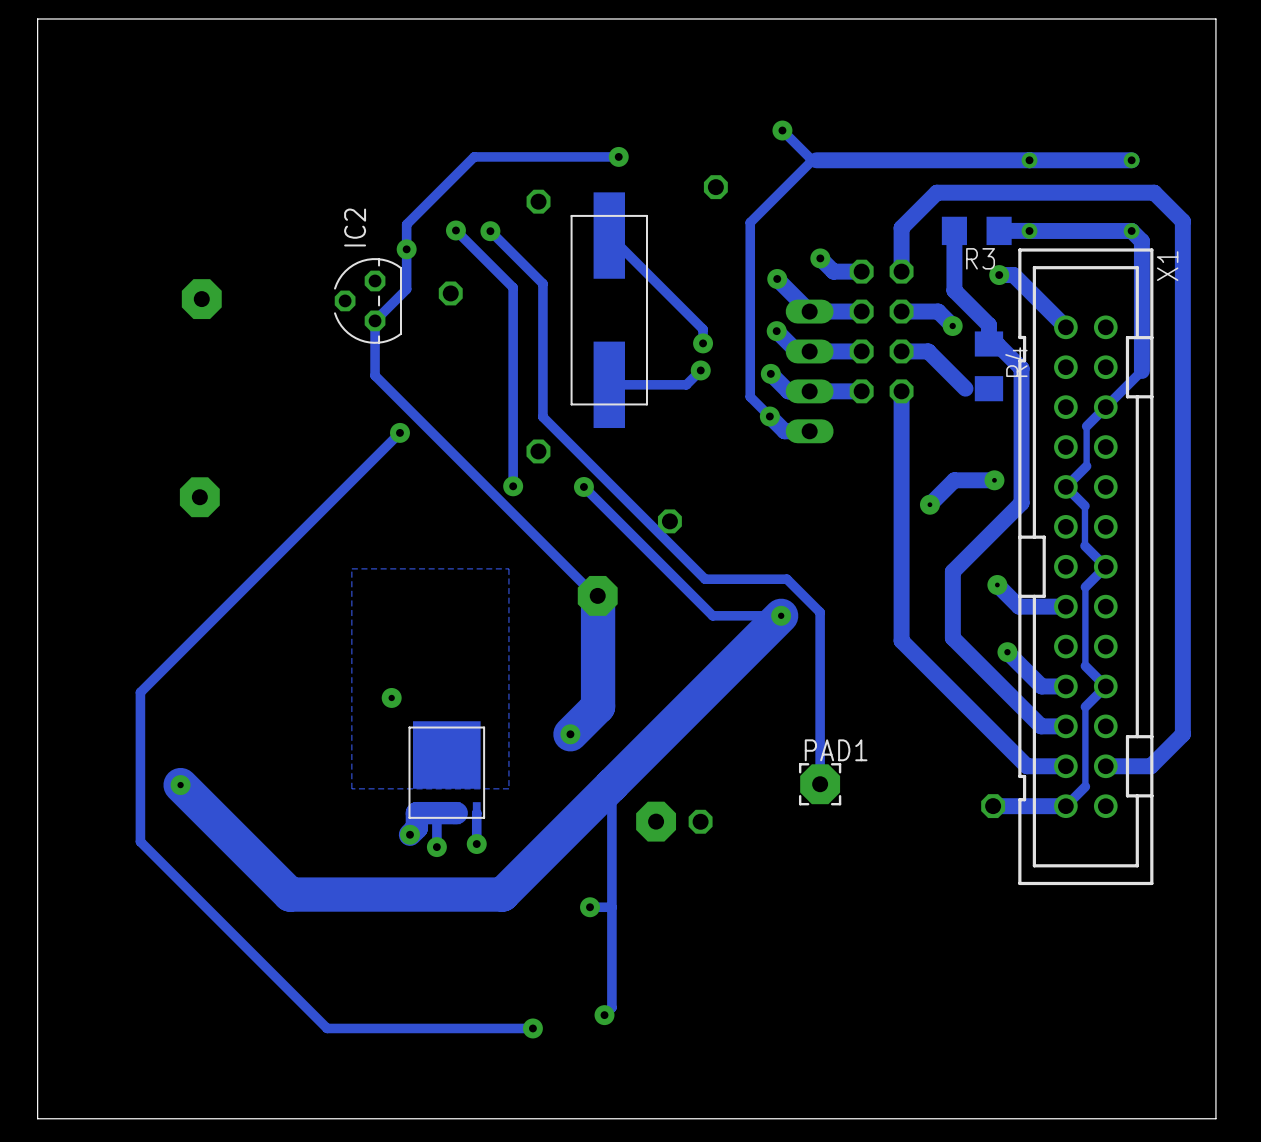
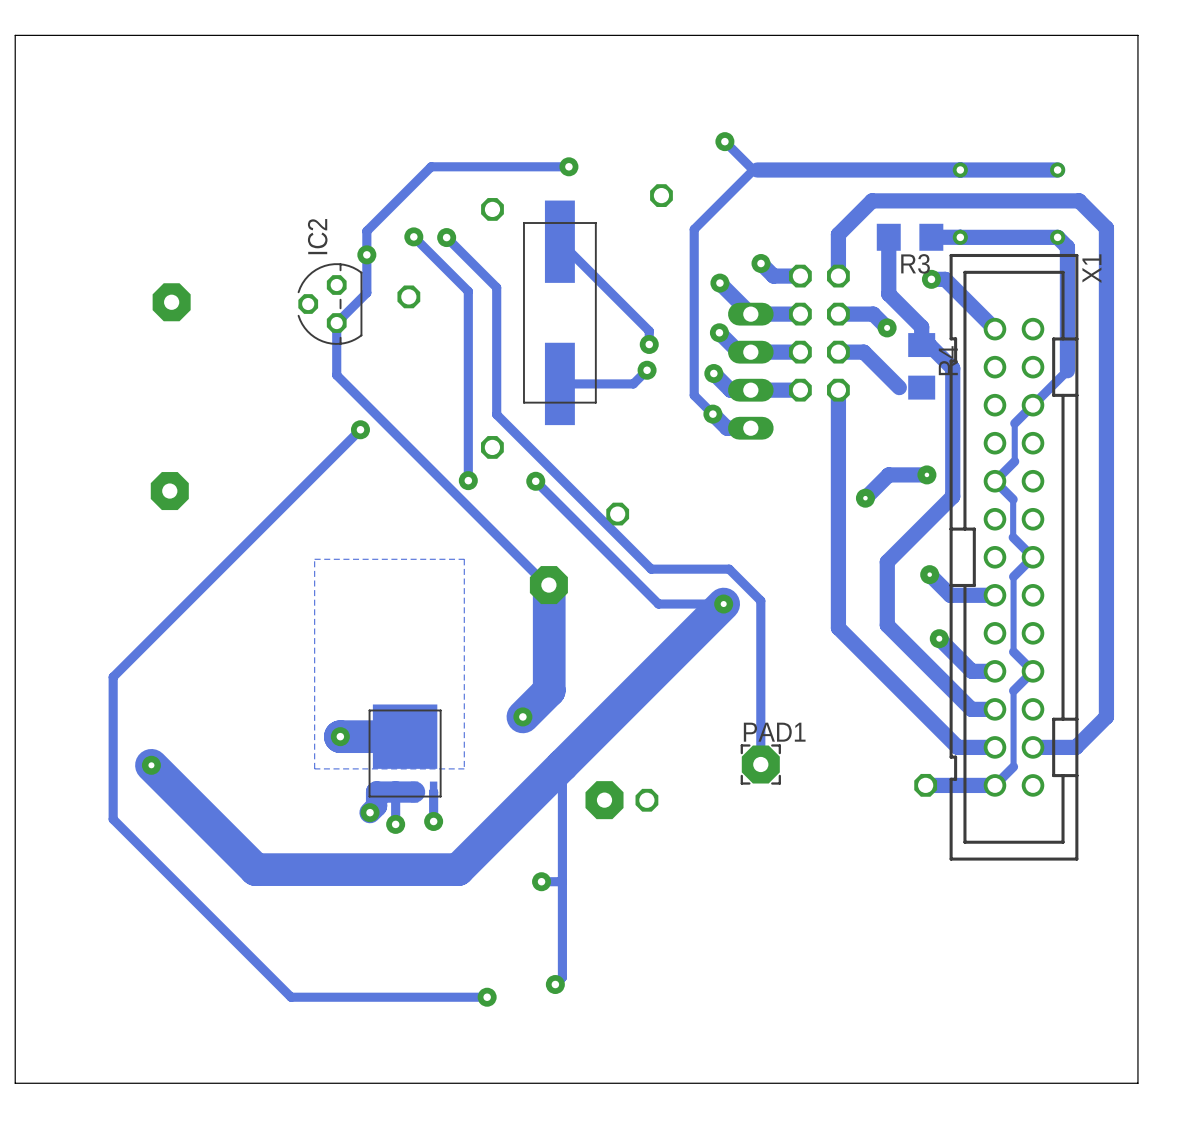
via: (391, 697) -> none
via: none -> (340, 736)
track: none -> (405, 736) (340, 736)

